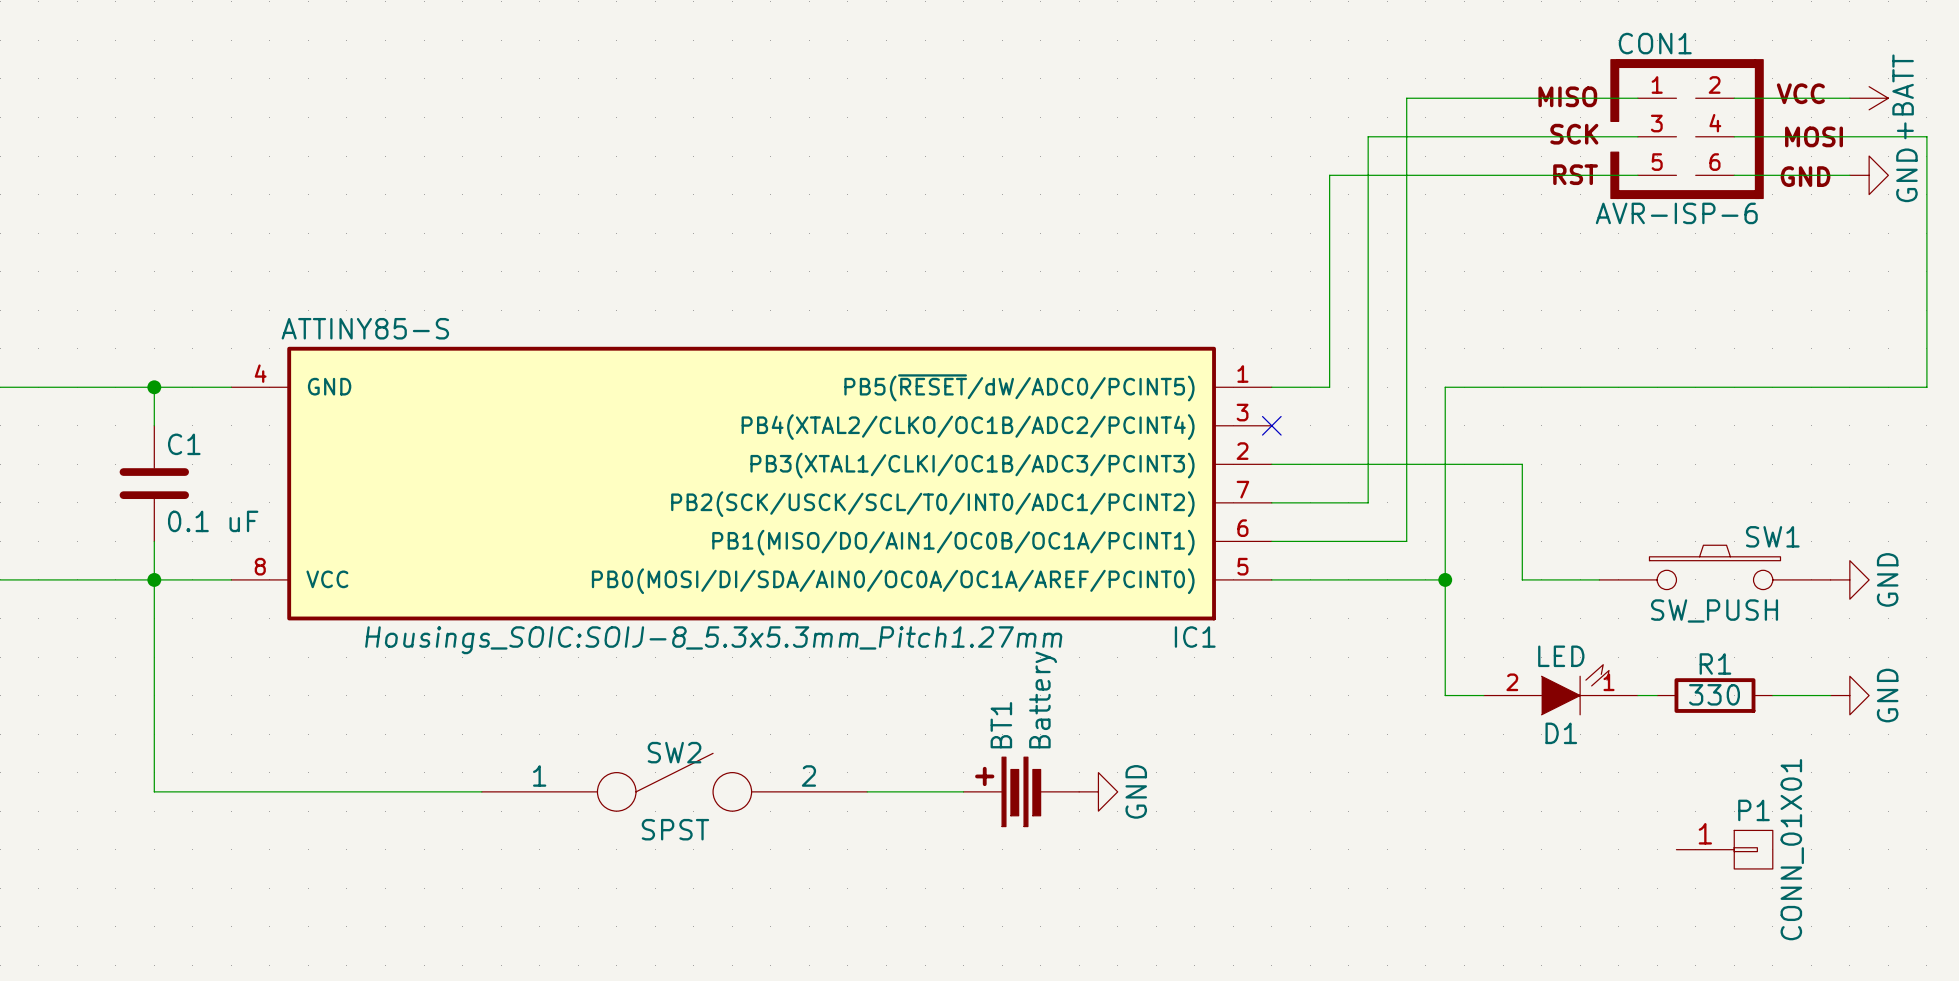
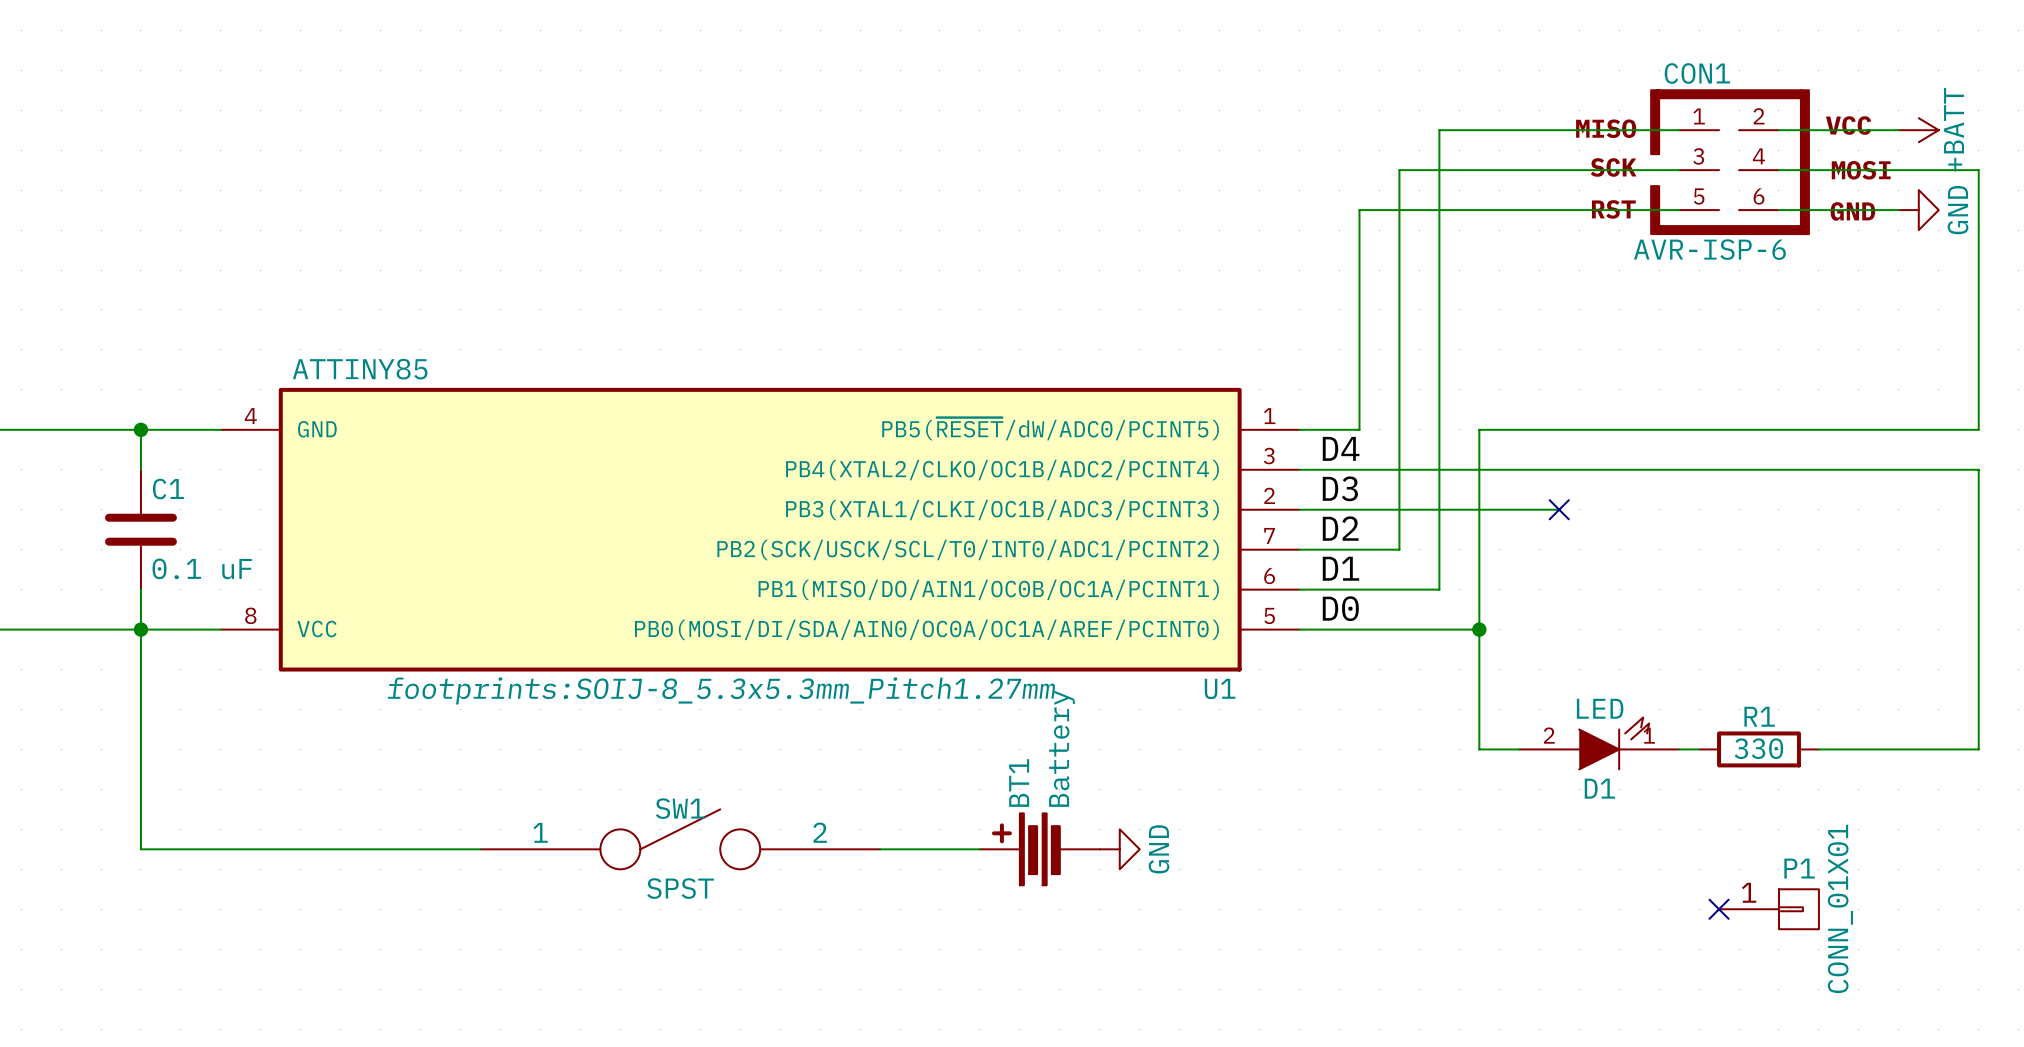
IC1 value: ATTINY85-S (365, 328) -> ATTINY85 (360, 369)
label: none -> D4 (1341, 448)
wire: none -> (1299, 469) (1978, 469) (1978, 749) (1878, 749)
no-connect mark: (1271, 425) -> none
label: none -> D3 (1340, 488)
wire: (1522, 464) (1522, 579) (1599, 579) -> none
no-connect mark: none -> (1559, 509)
label: none -> D2 (1340, 528)
label: none -> D1 (1340, 568)
label: none -> D0 (1340, 608)
SW1: SW_PUSH (1714, 567) -> none
power symbol: GND (1849, 579) -> none
IC1 name: IC1 (1195, 637) -> U1 (1220, 688)
IC1 text: Housings_SOIC:SOIJ-8_5.3x5.3mm_Pitch1.27mm (713, 640) -> footprints:SOIJ-8_5.3x5.3mm_Pitch1.27mm (721, 690)
power symbol: GND (1849, 695) -> none
SW2 name: SW2 (674, 752) -> SW1 (680, 808)
no-connect mark: none -> (1719, 909)

